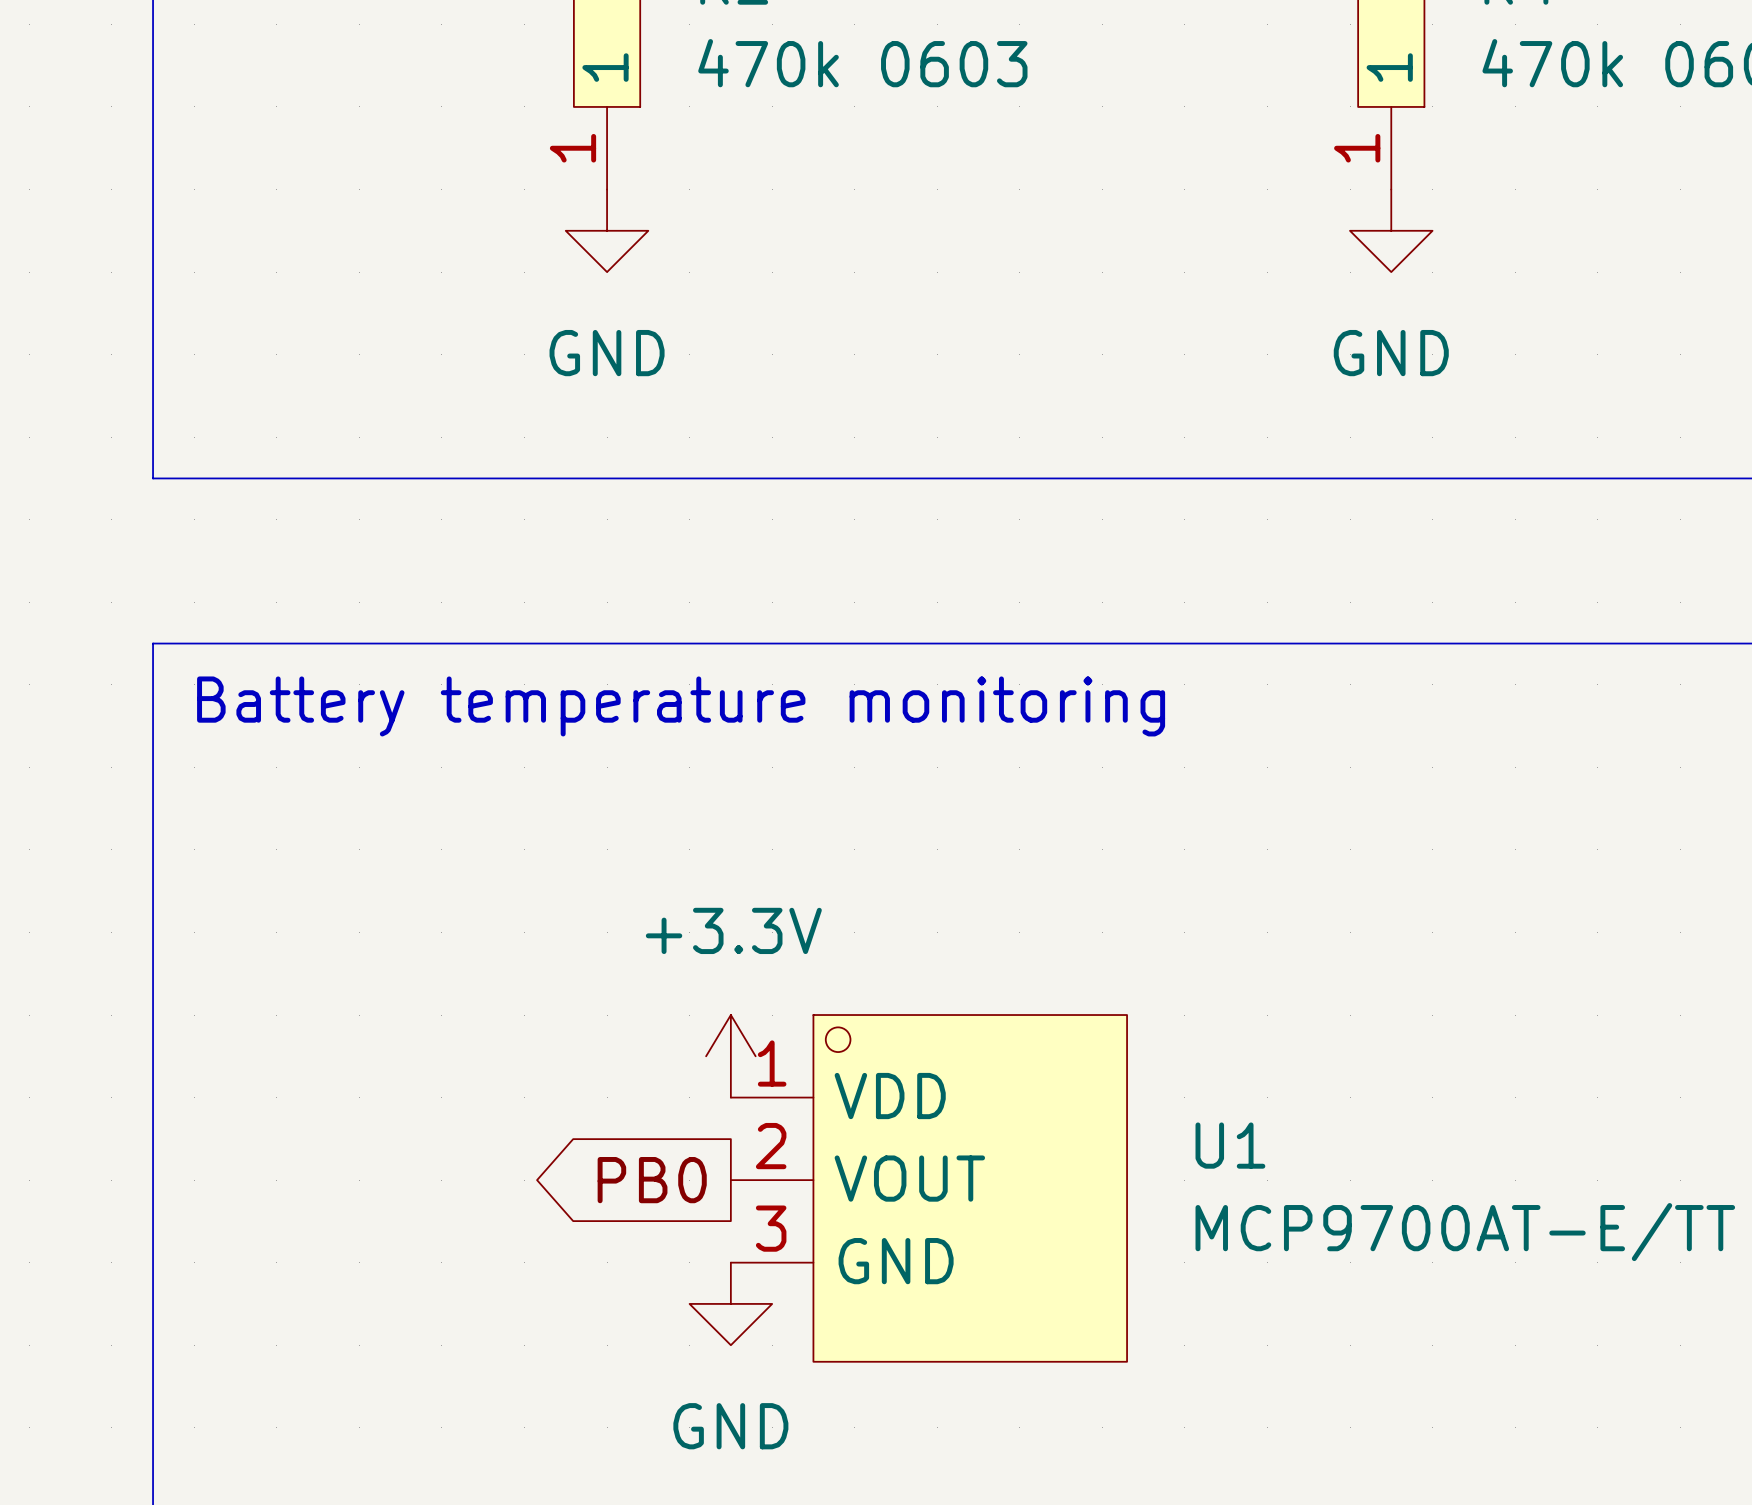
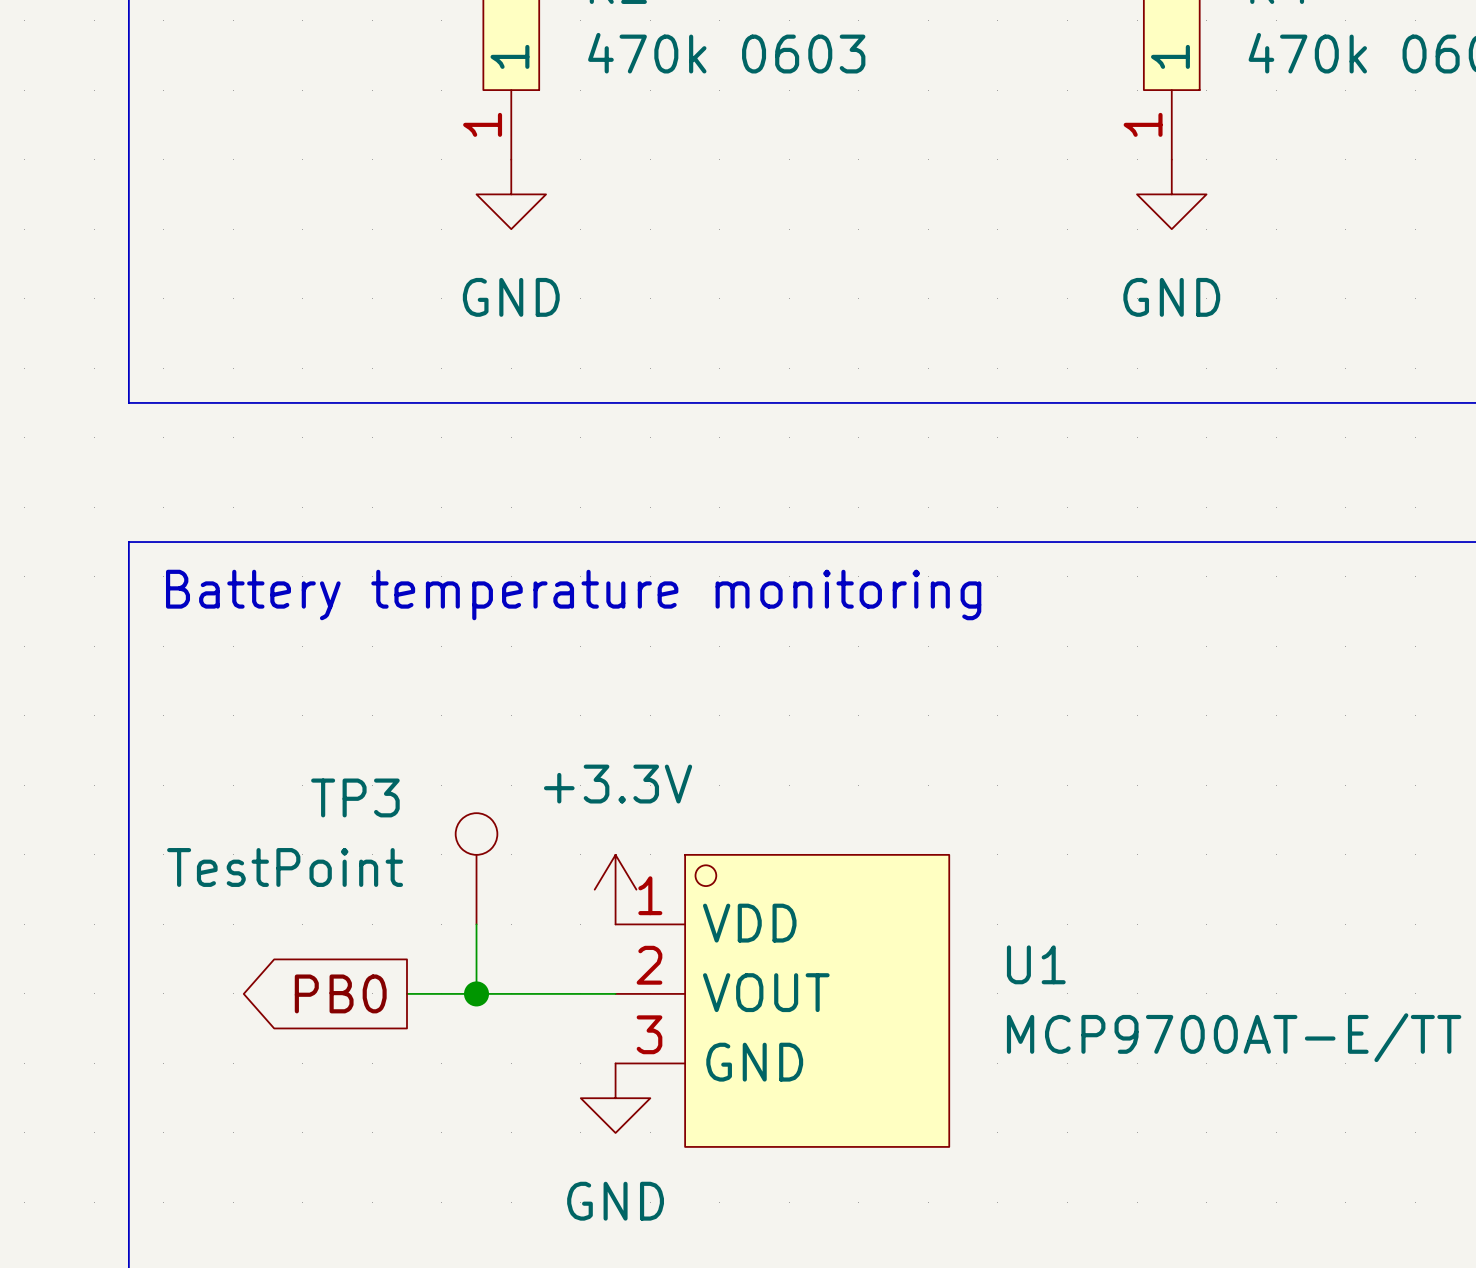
TP3: none -> TestPoint (476, 868)
wire: none -> (476, 924) (476, 993)
wire: none -> (406, 993) (615, 993)
junction: none -> (476, 993)
global label position: PB0 (652, 1180) -> PB0 (340, 993)

